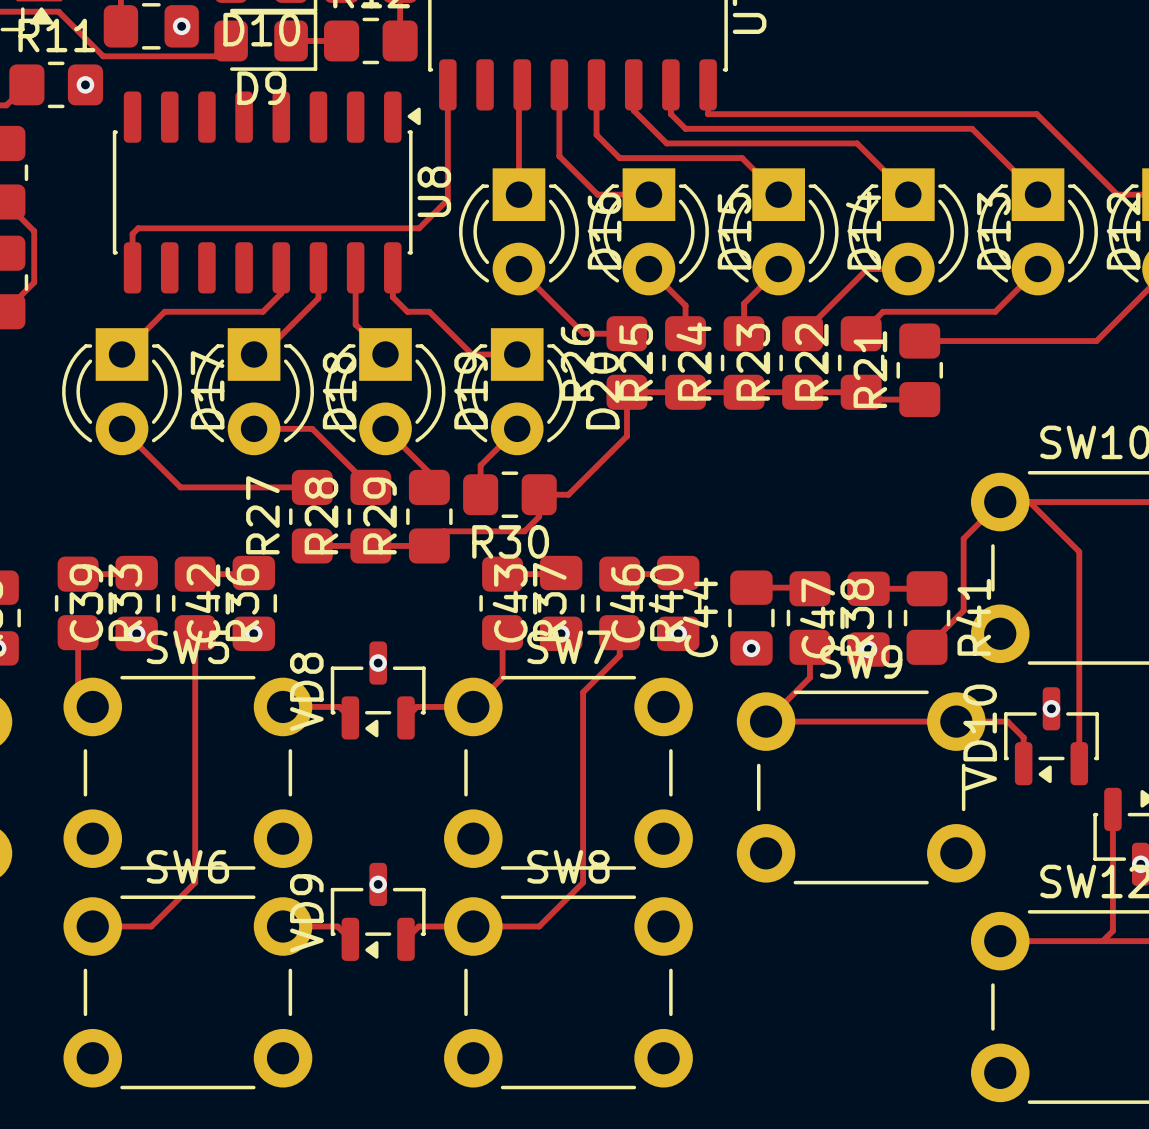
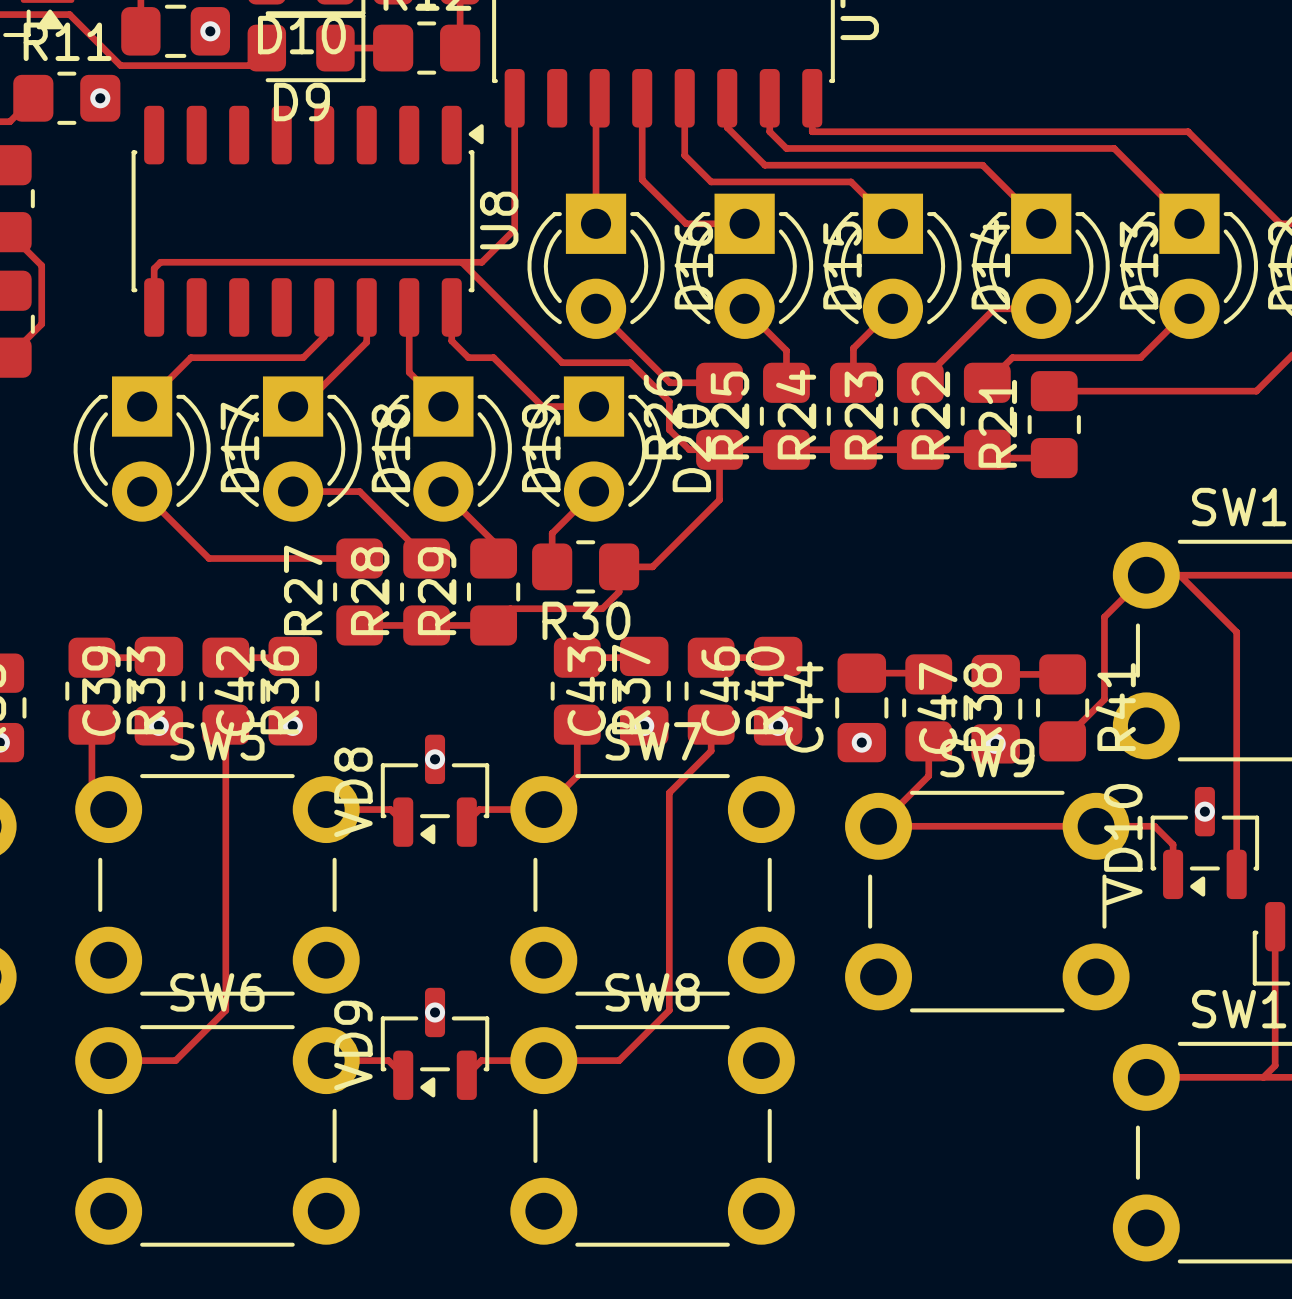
track: none -> (461, 262) (562, 362) (630, 362) (669, 401) (669, 429) (689, 449) (719, 449)

